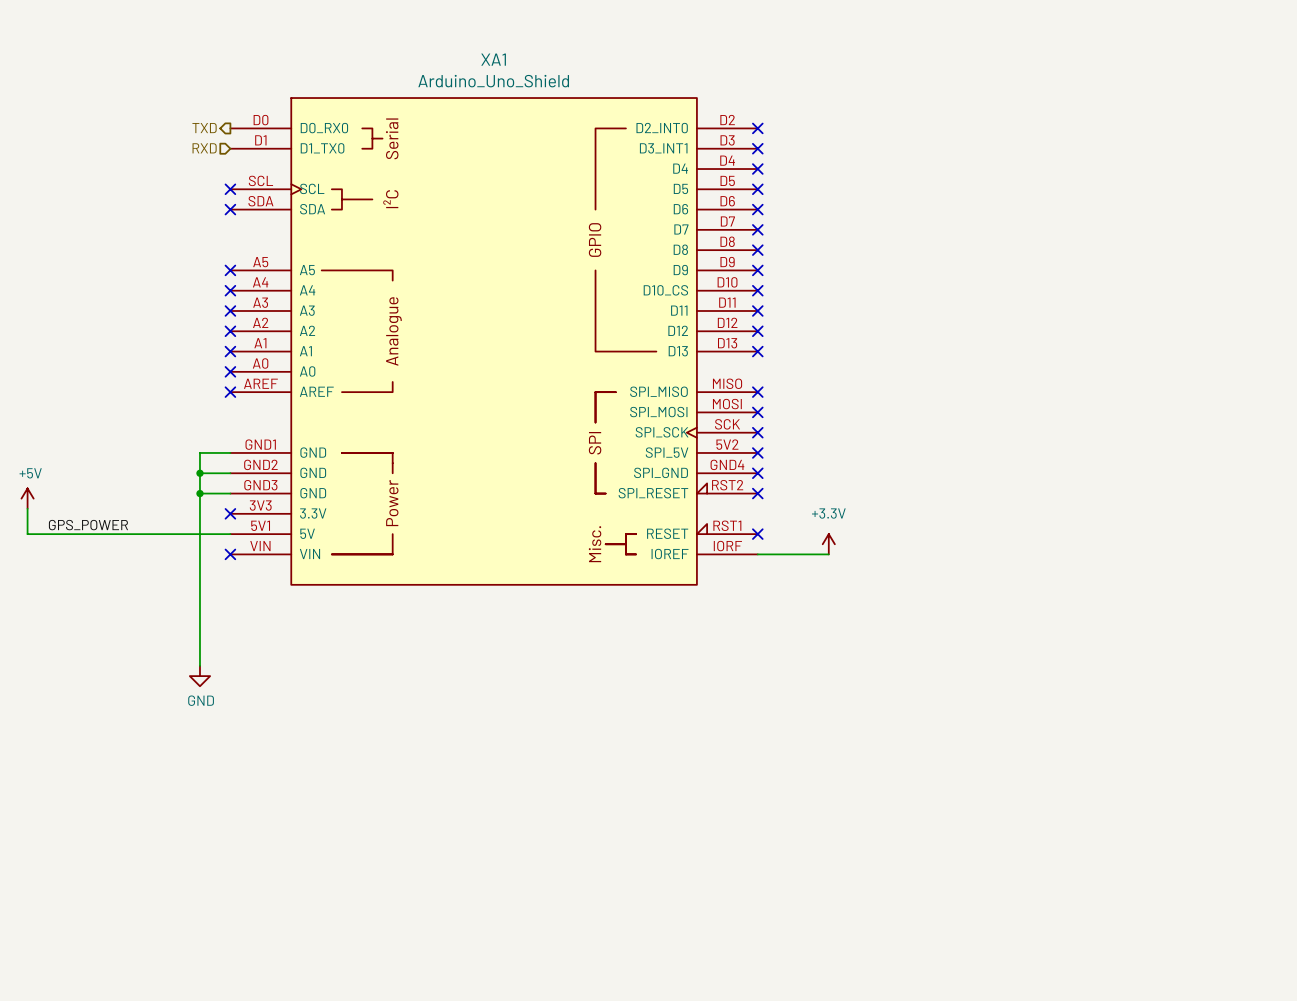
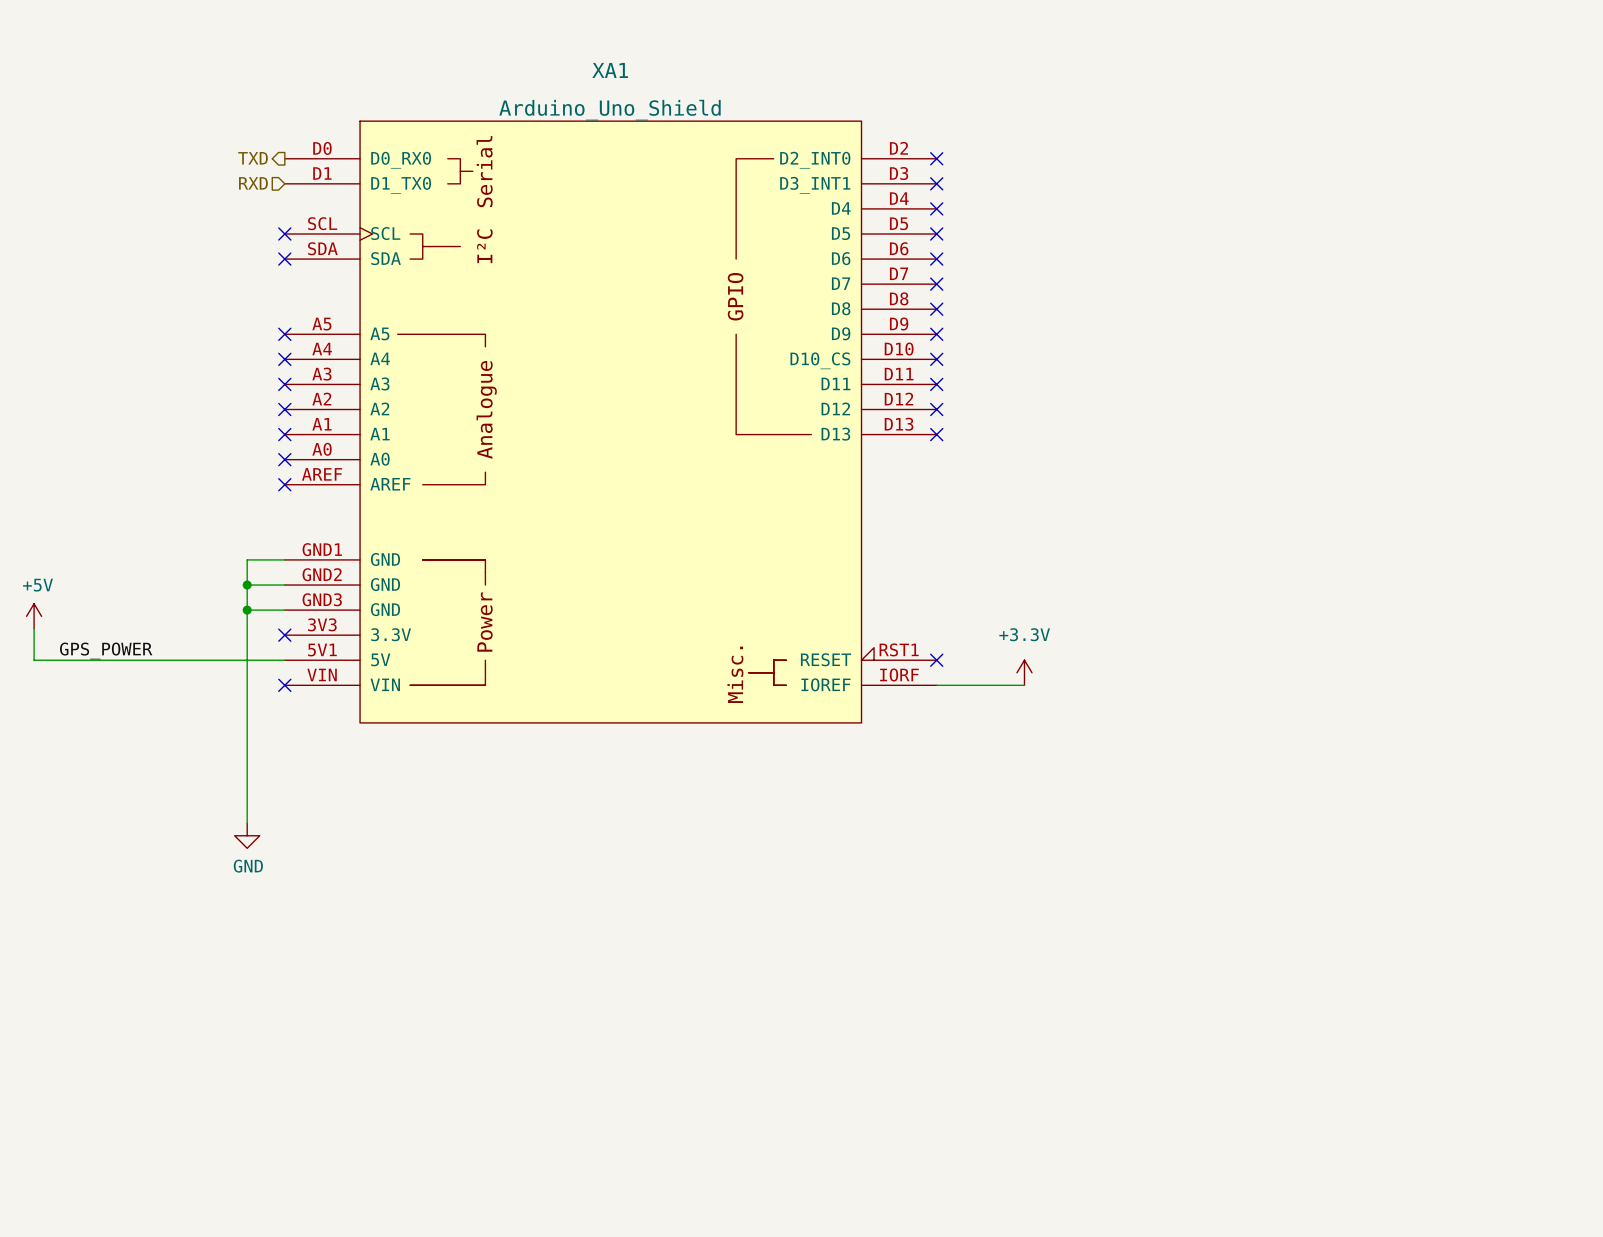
XA1 symbol: [230, 98, 758, 585] -> [284, 121, 937, 723]
no-connect mark: (757, 392) -> none
no-connect mark: (757, 412) -> none
no-connect mark: (757, 432) -> none
no-connect mark: (757, 452) -> none
no-connect mark: (757, 473) -> none
no-connect mark: (757, 493) -> none

